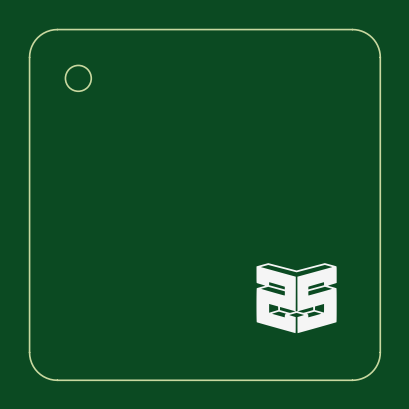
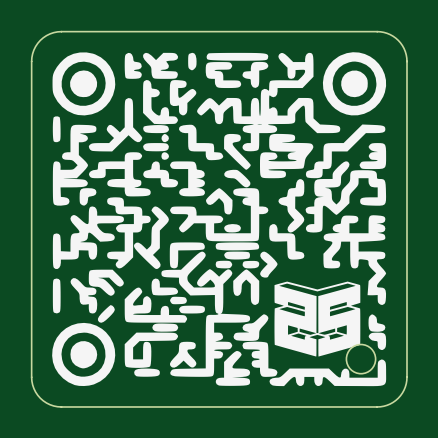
drawing: none -> [52, 52, 387, 387]
round board edge: [65, 65, 92, 92] -> none
round board edge: none -> [346, 344, 376, 375]

